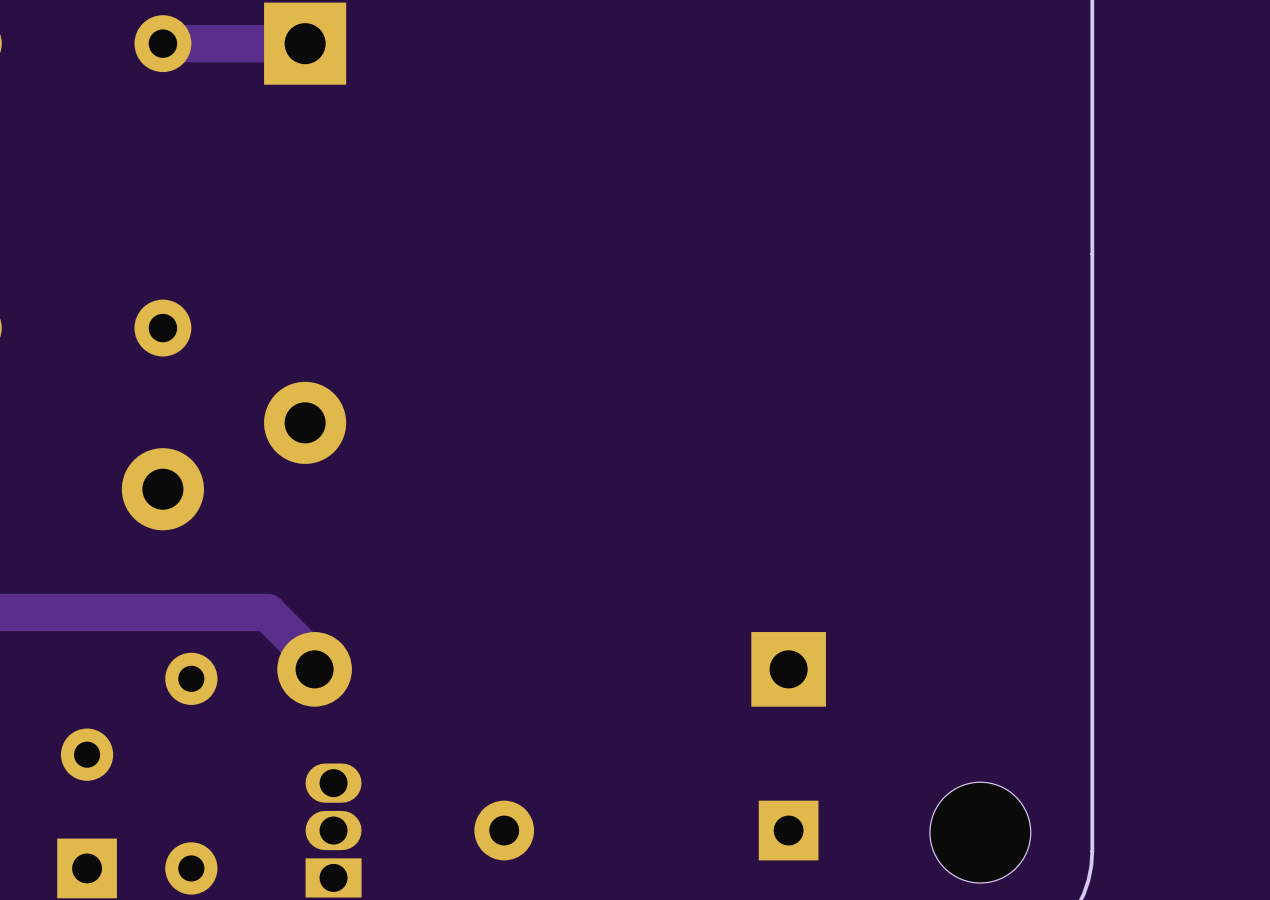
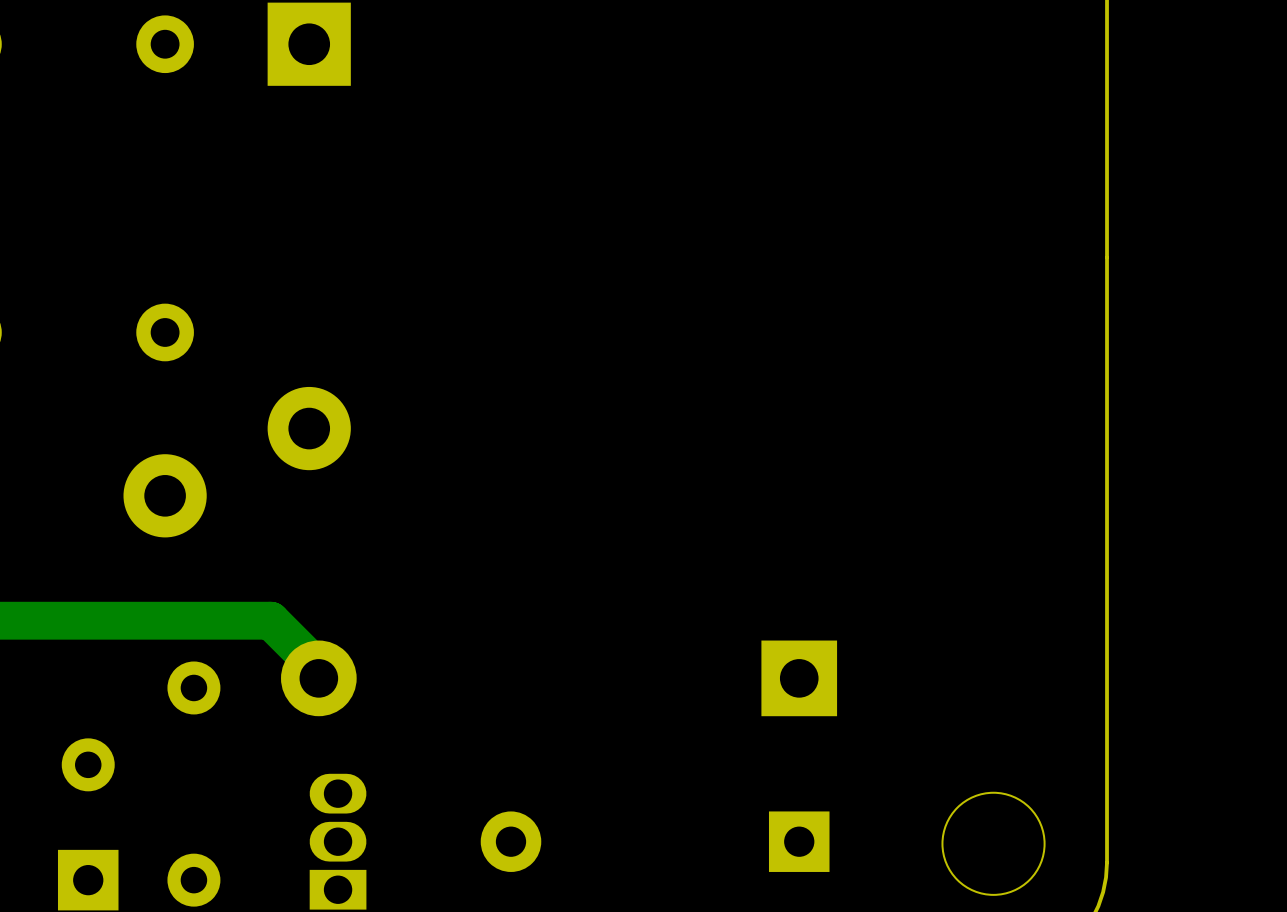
track: (305, 43) (162, 43) -> none

